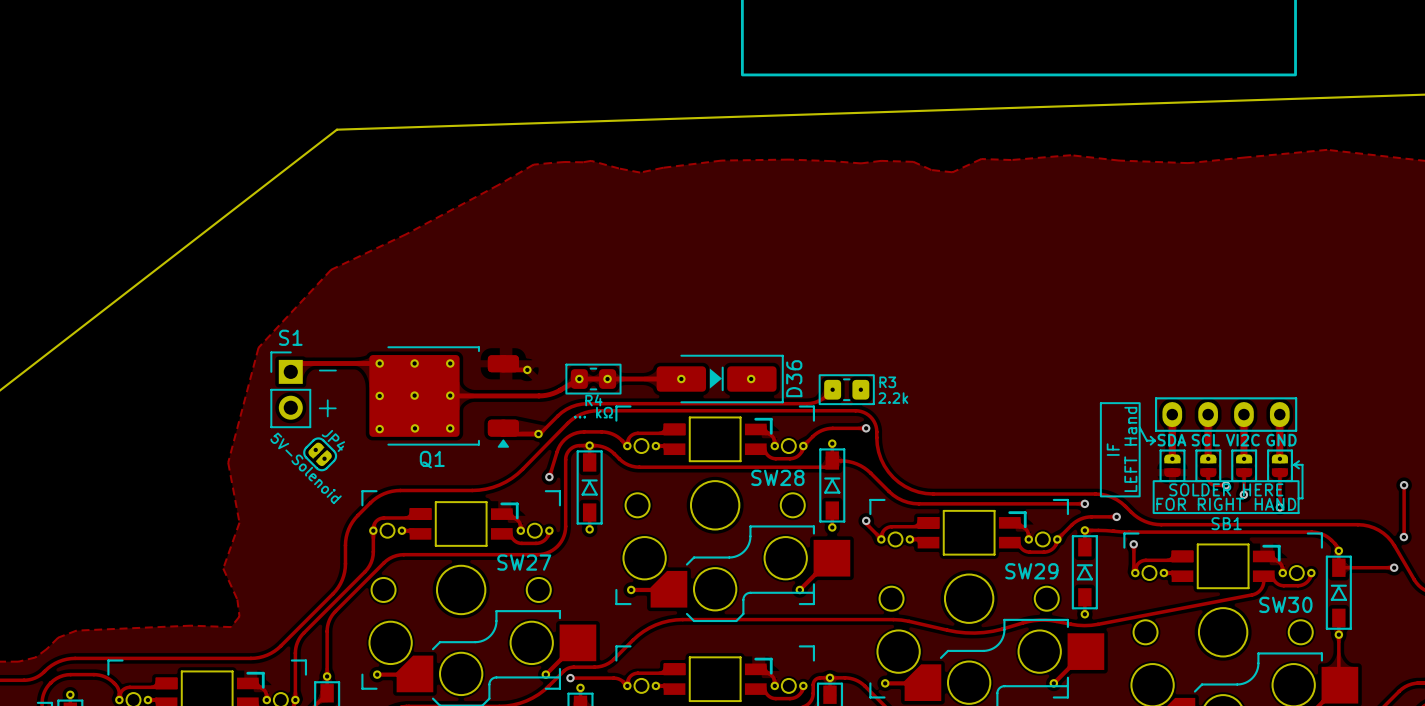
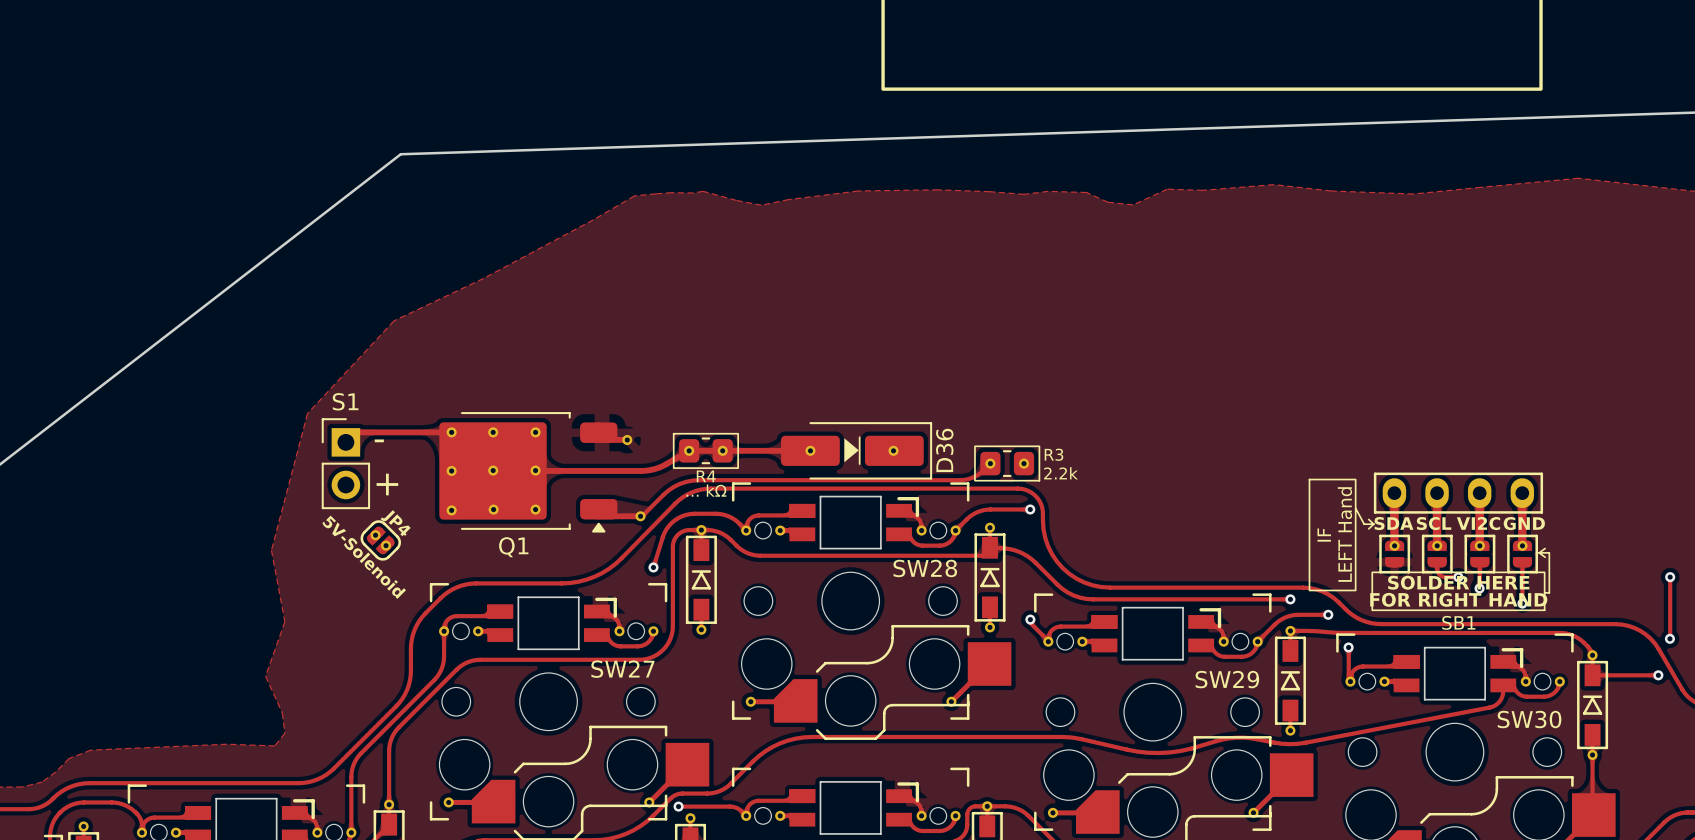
R3 footprint: [818, 374, 875, 405] -> [974, 445, 1041, 482]
JP4 footprint: [303, 437, 338, 472] -> [360, 520, 402, 561]
SB1 footprint: [1152, 449, 1304, 514] -> [1371, 534, 1551, 612]

